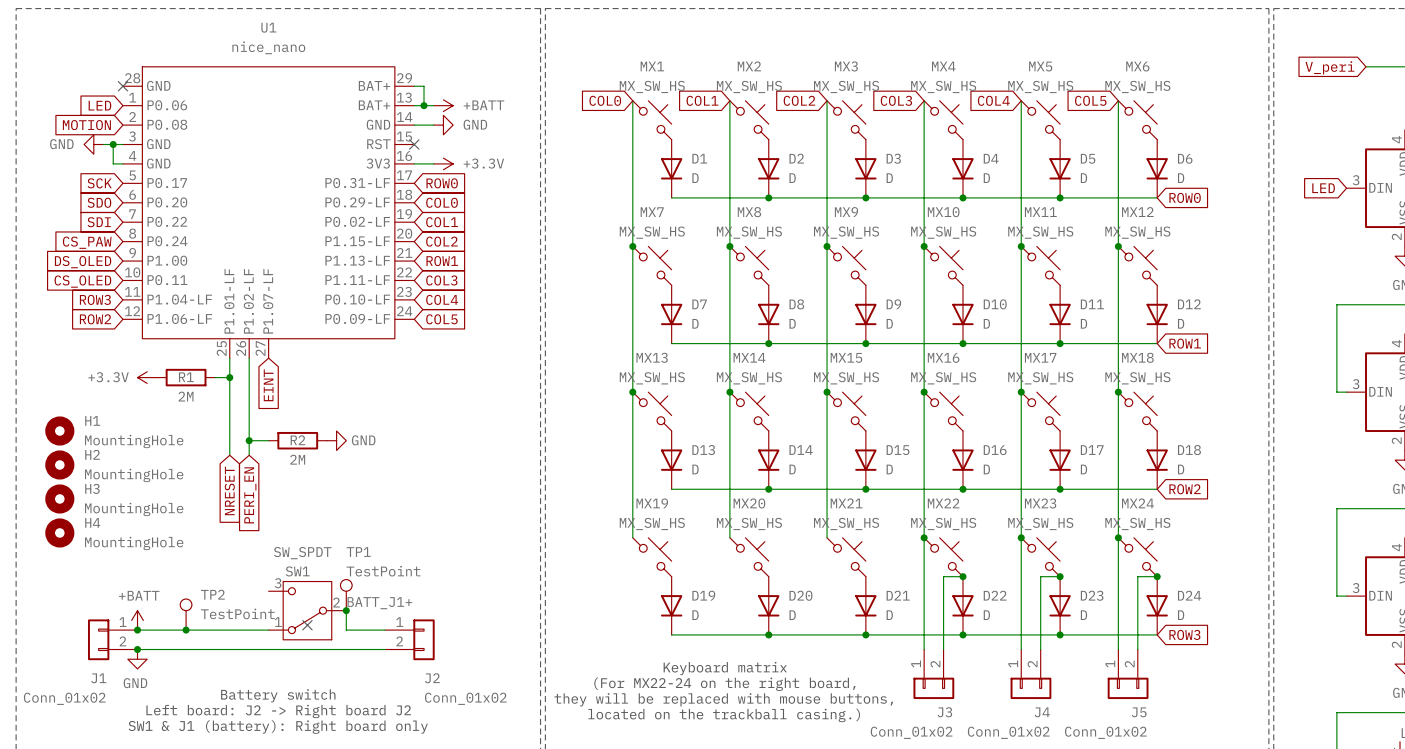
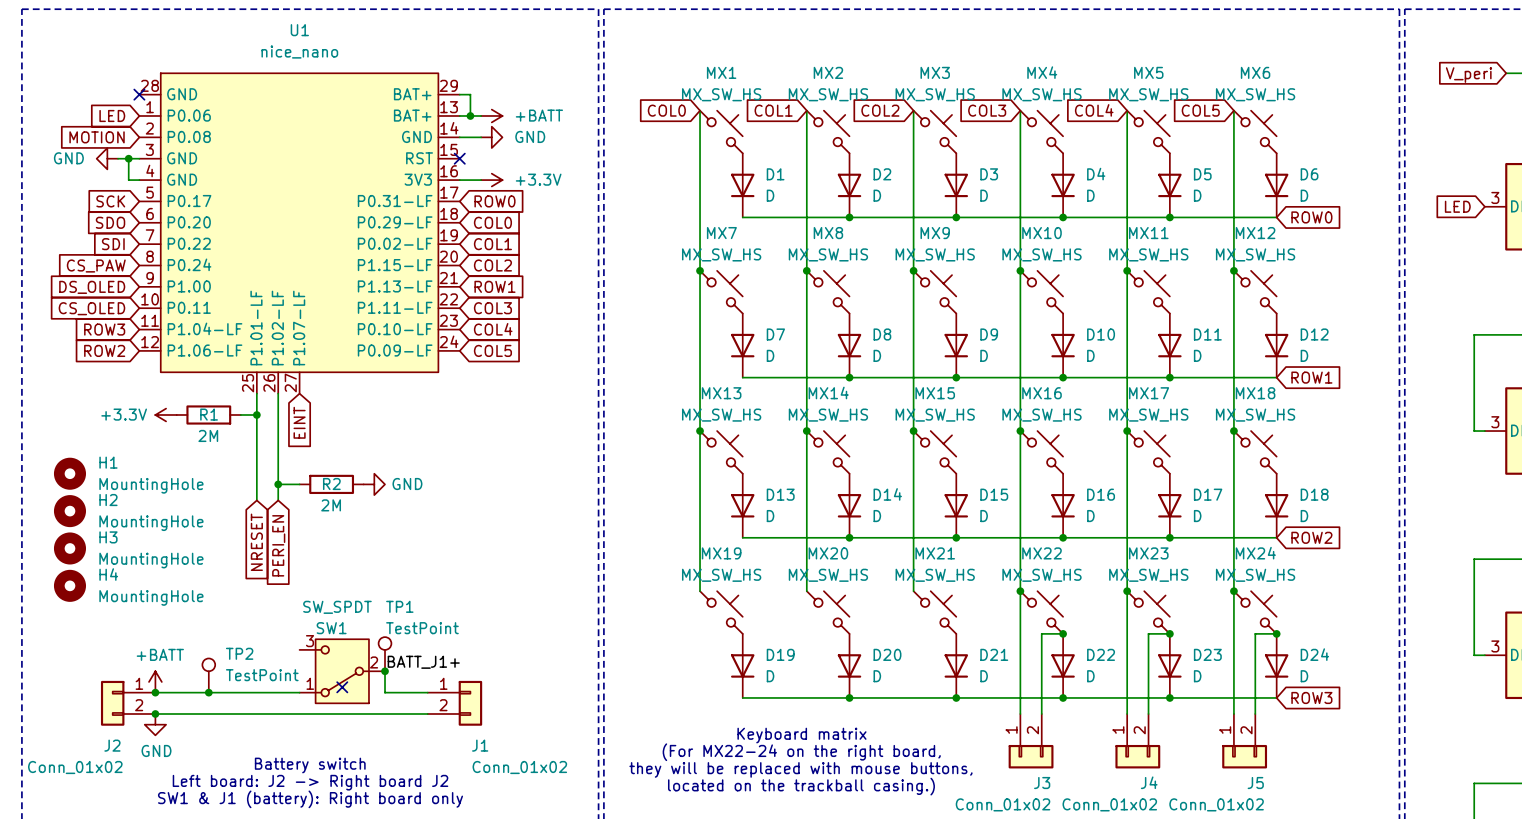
J1 name: J1 (98, 678) -> J2 (112, 745)
J2 name: J2 (432, 678) -> J1 (480, 745)

